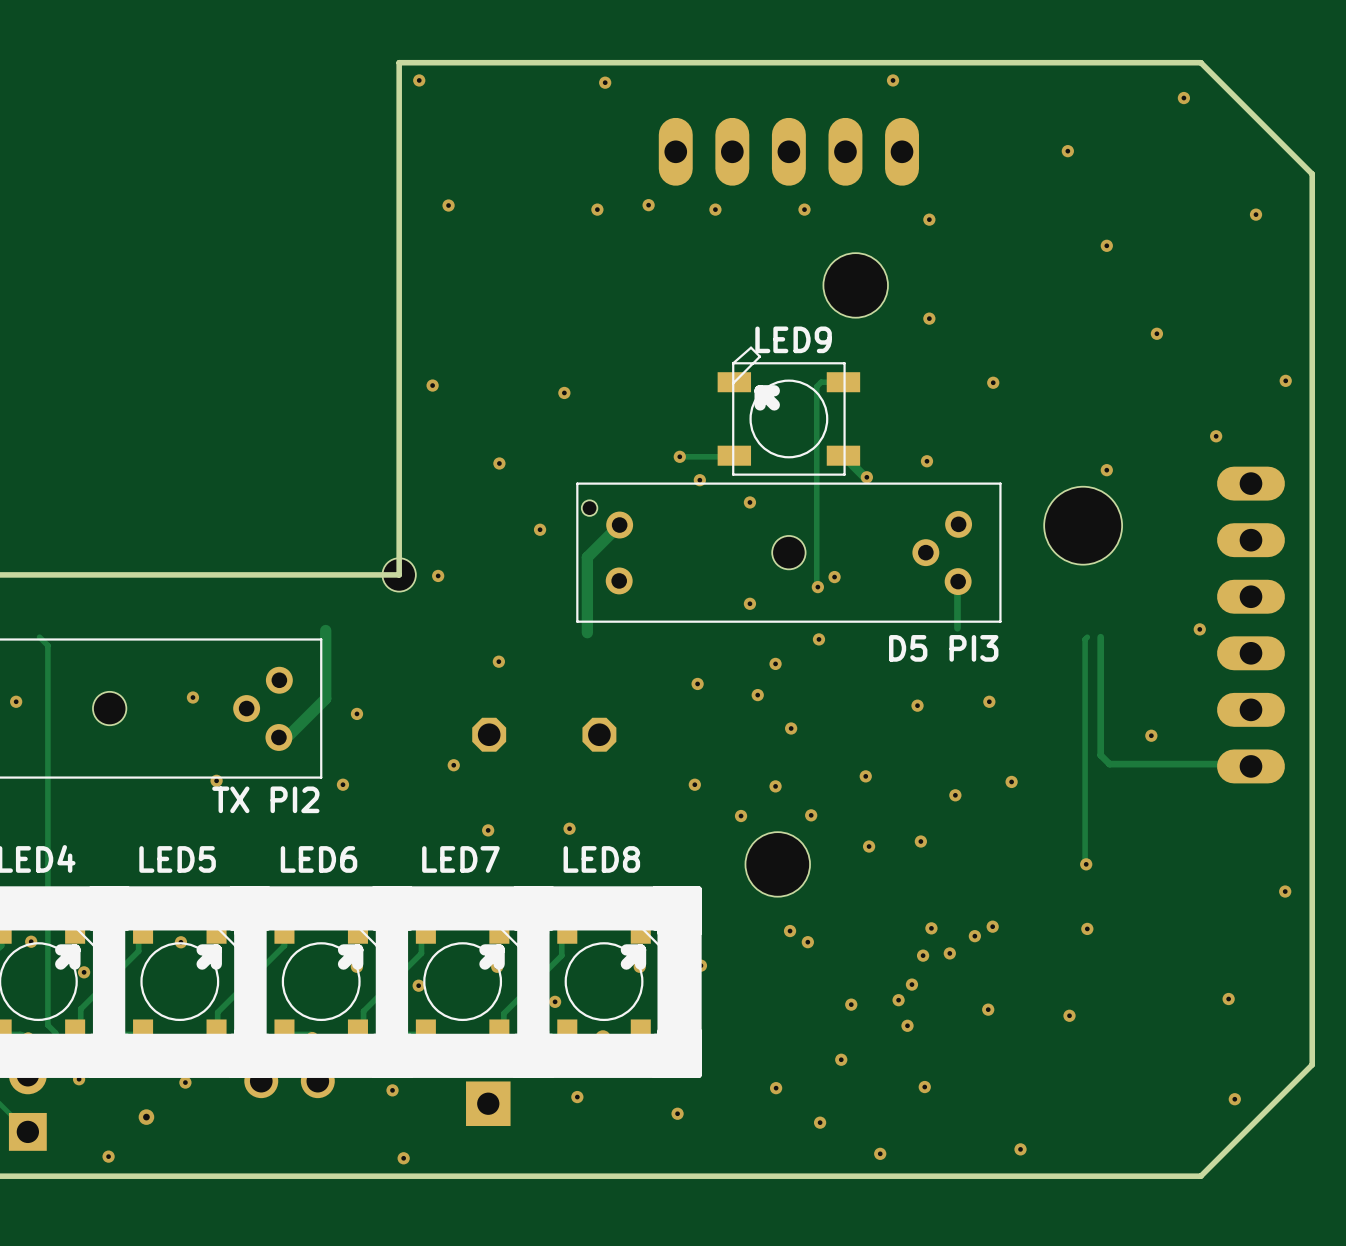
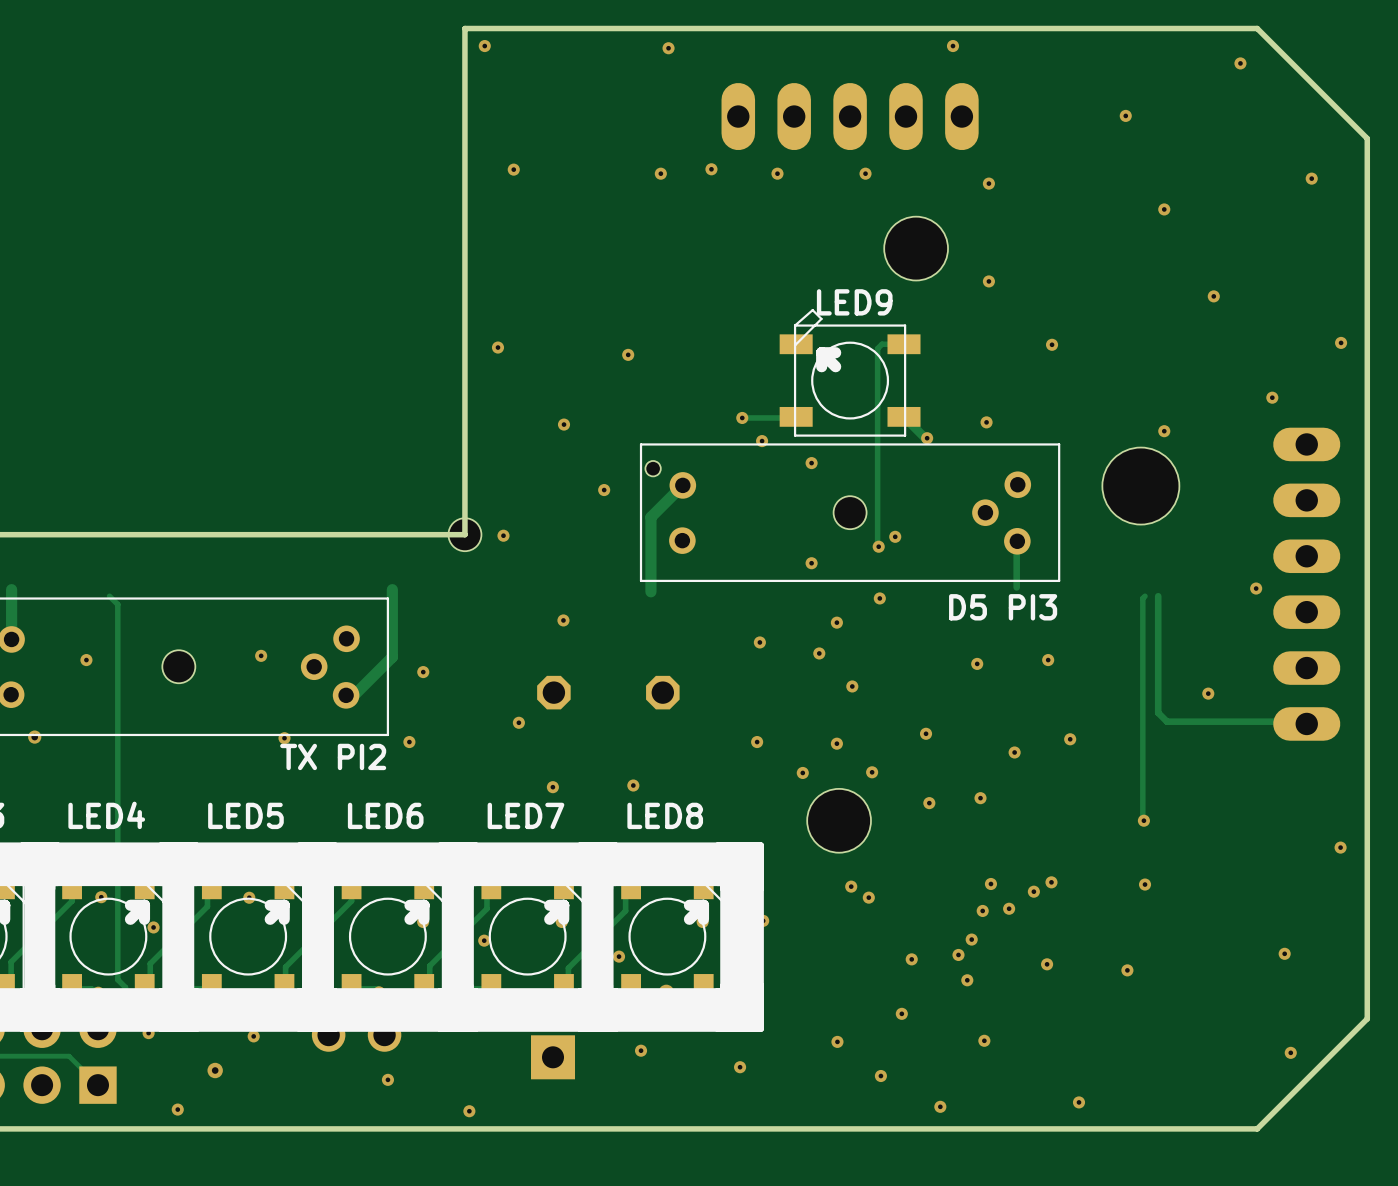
via position: (392, 1090) -> (387, 1079)

